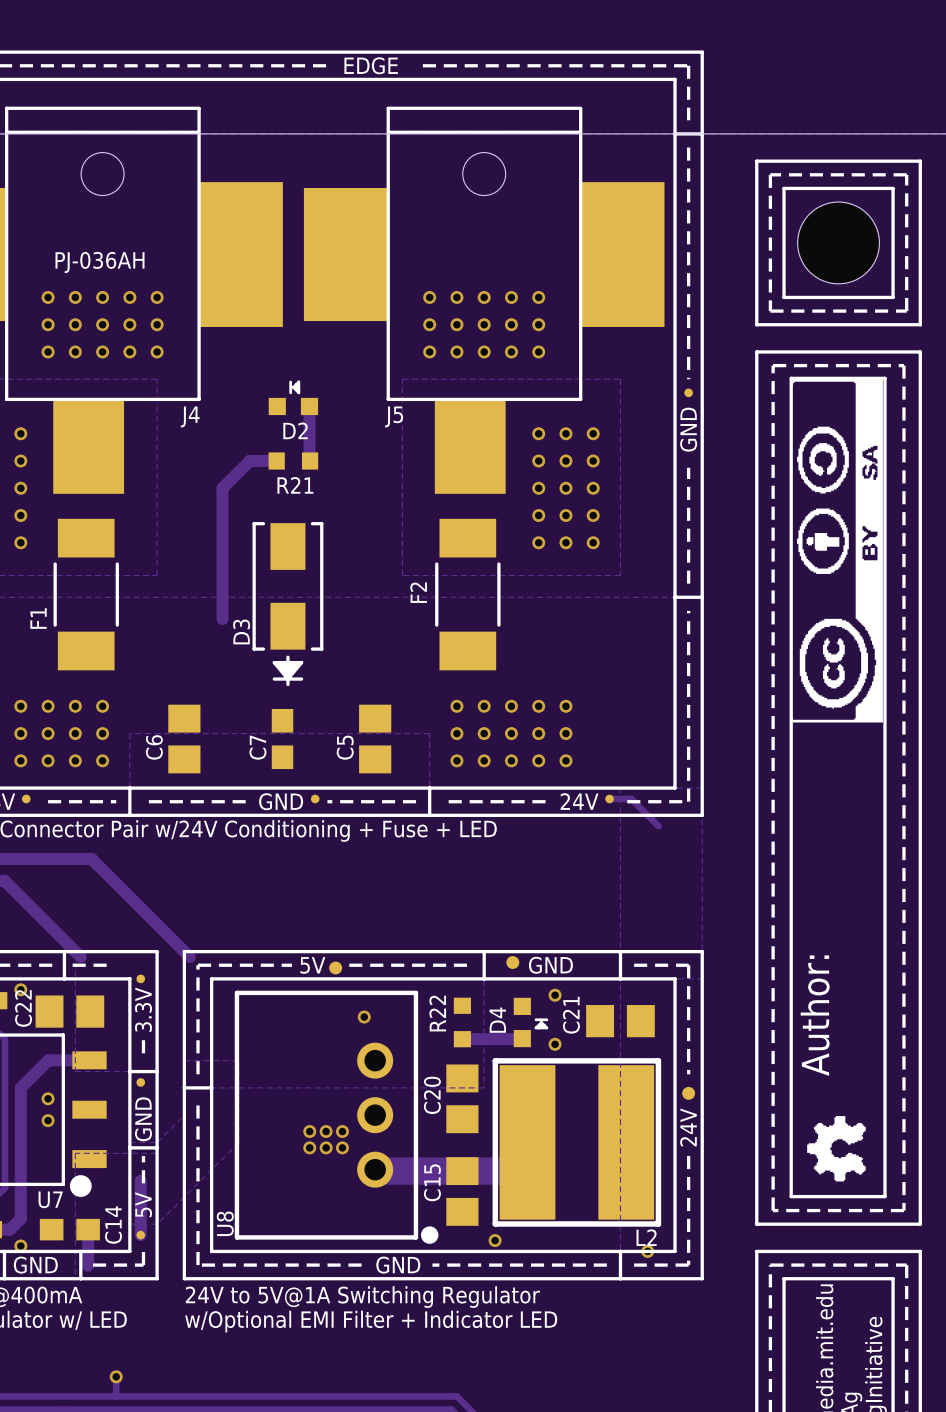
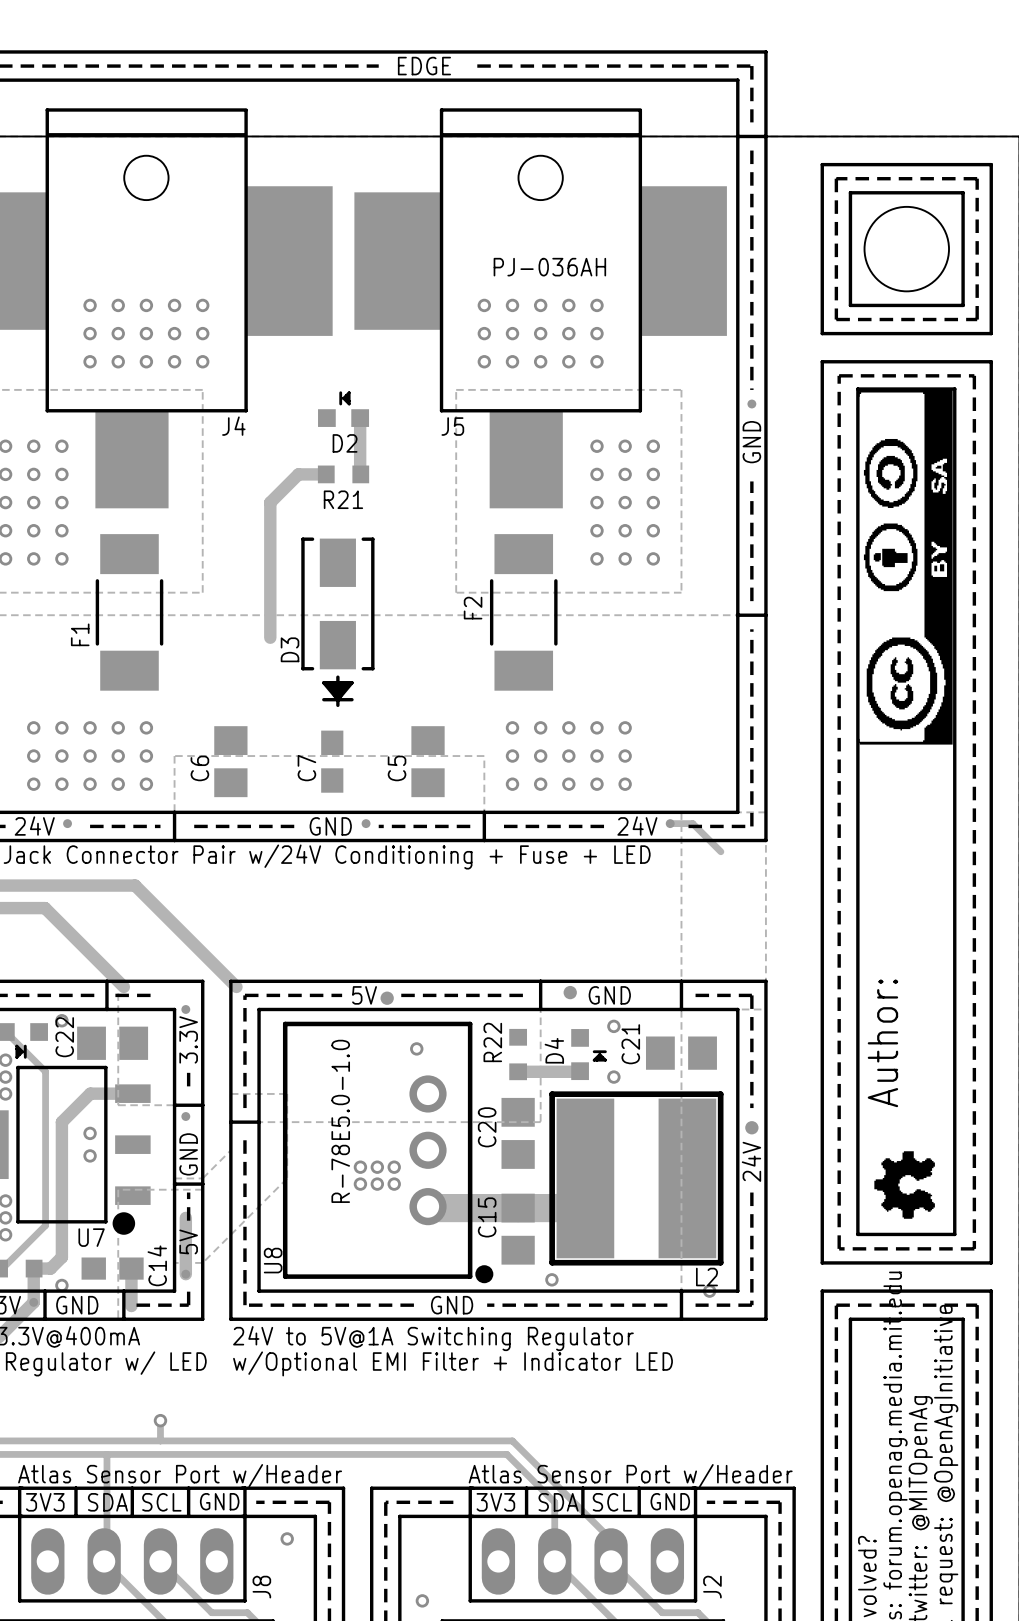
J4 value: PJ-036AH (100, 262) -> none
J5 value: none -> PJ-036AH (549, 267)
U8 value: none -> R-78E5.0-1.0 (340, 1121)

